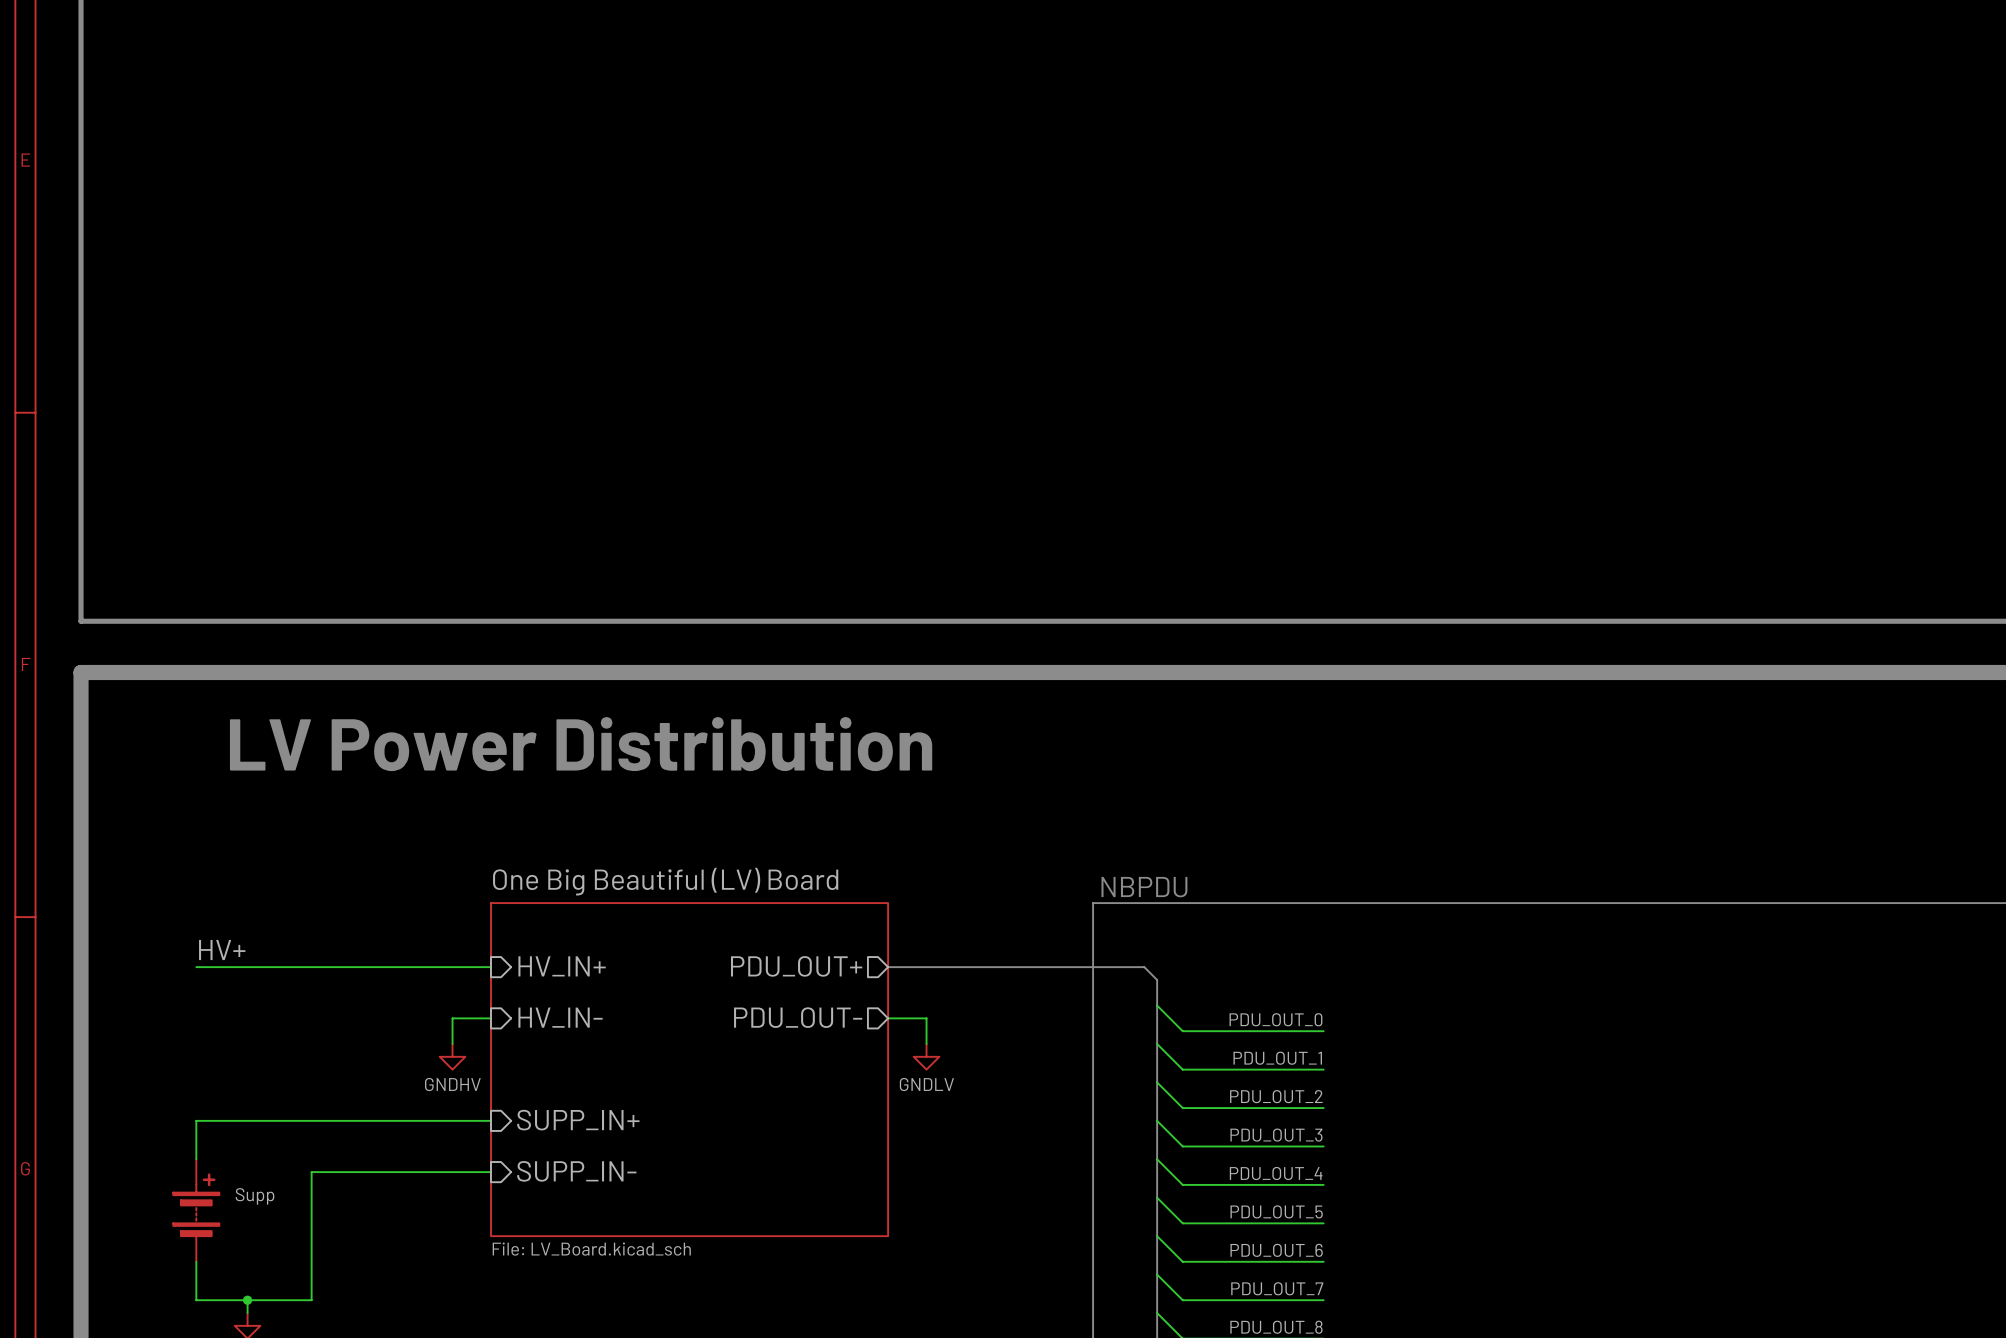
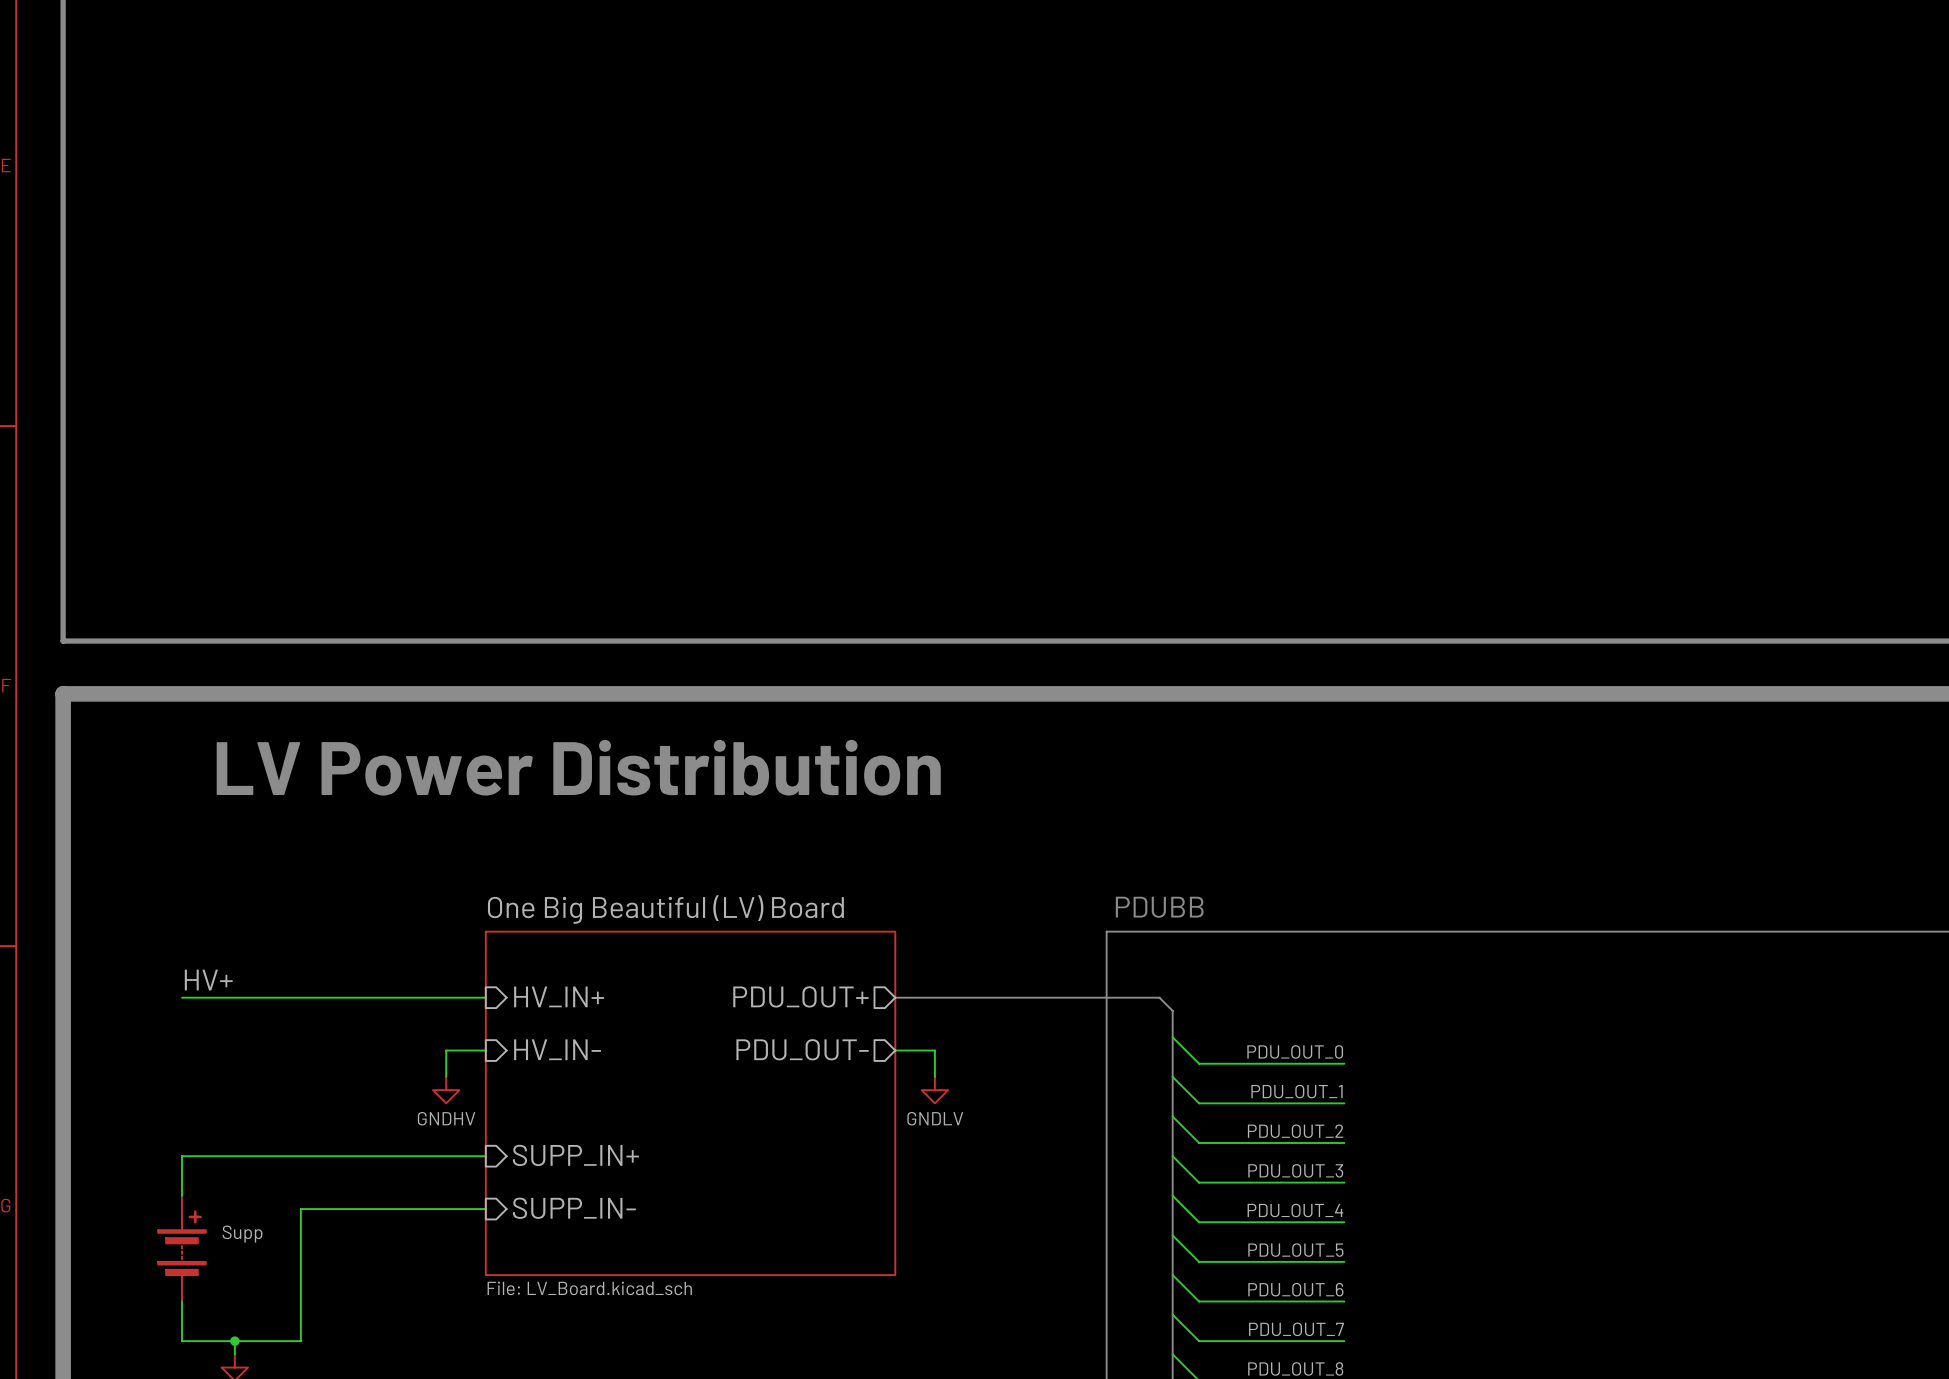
text: NBPDU (1144, 887) -> PDUBB (1159, 907)

